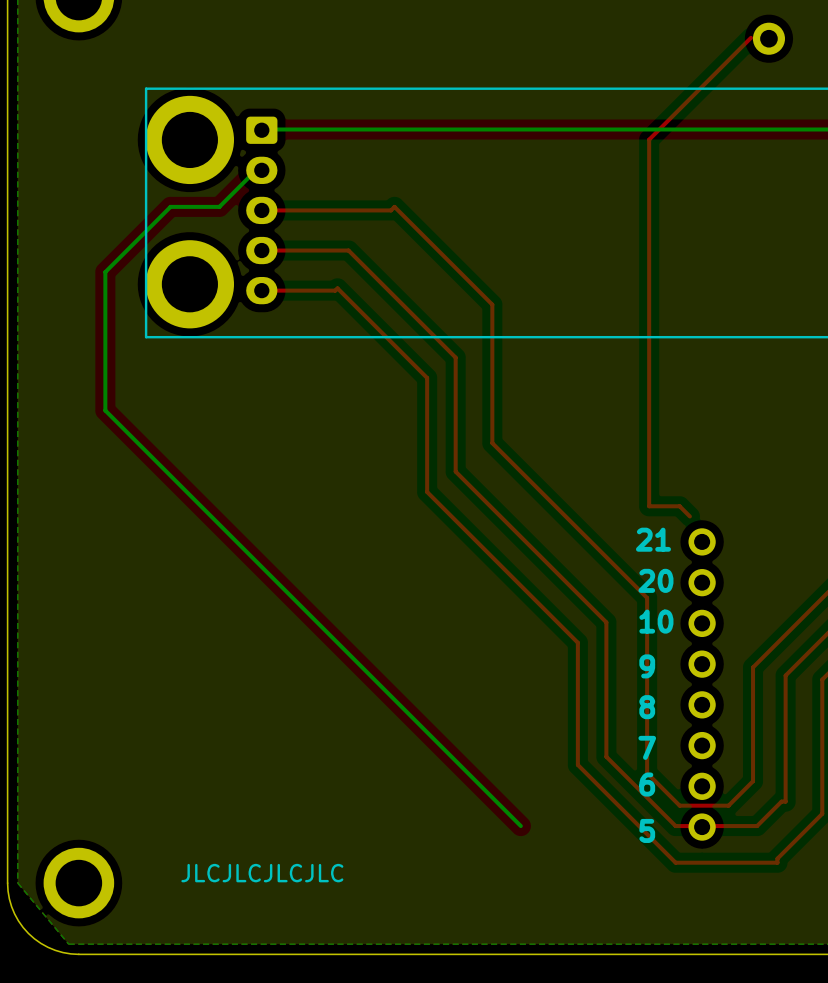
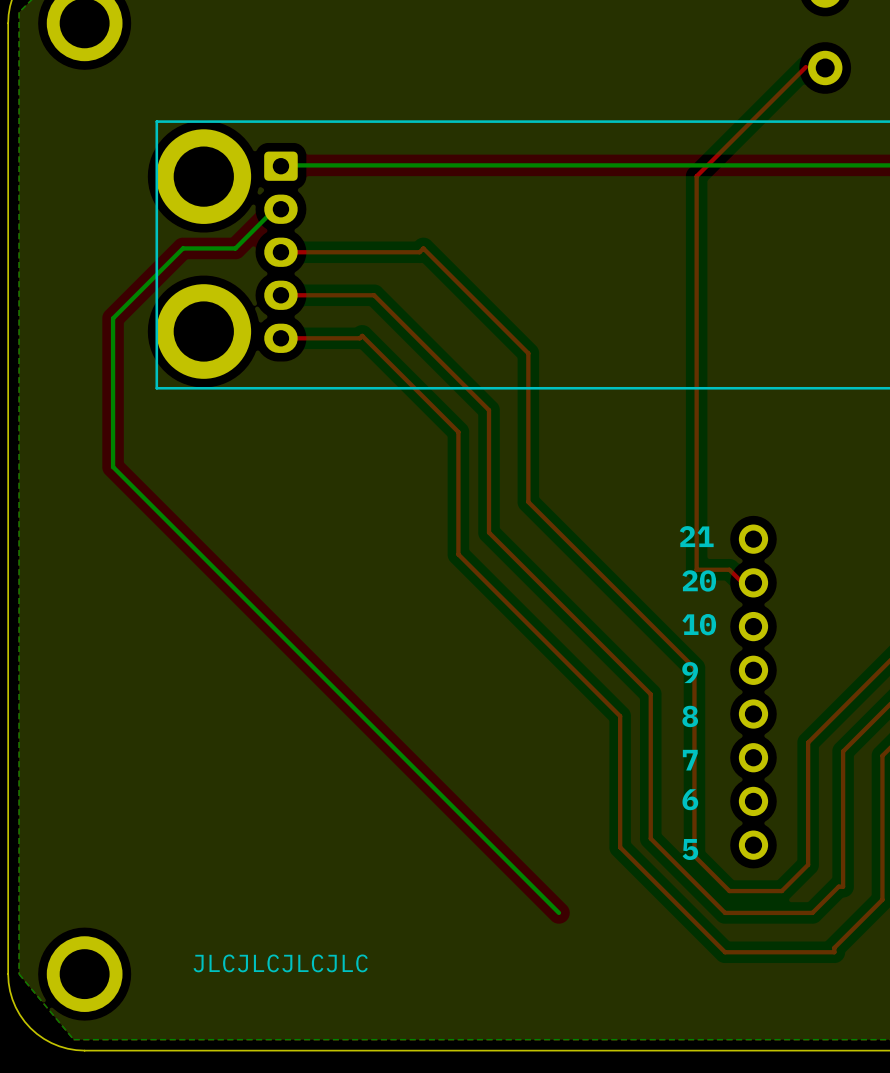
text position: 21 (653, 539) -> 21 (696, 536)
text position: 20 (655, 580) -> 20 (699, 580)
text position: 10 (656, 621) -> 10 (699, 624)
text position: 9 (647, 666) -> 9 (690, 672)
part position: (702, 684) -> (753, 692)
text position: 8 (647, 707) -> 8 (690, 716)
text position: 7 (647, 747) -> 7 (690, 760)
text position: 6 (647, 784) -> 6 (690, 799)
text position: 5 (647, 830) -> 5 (690, 849)

